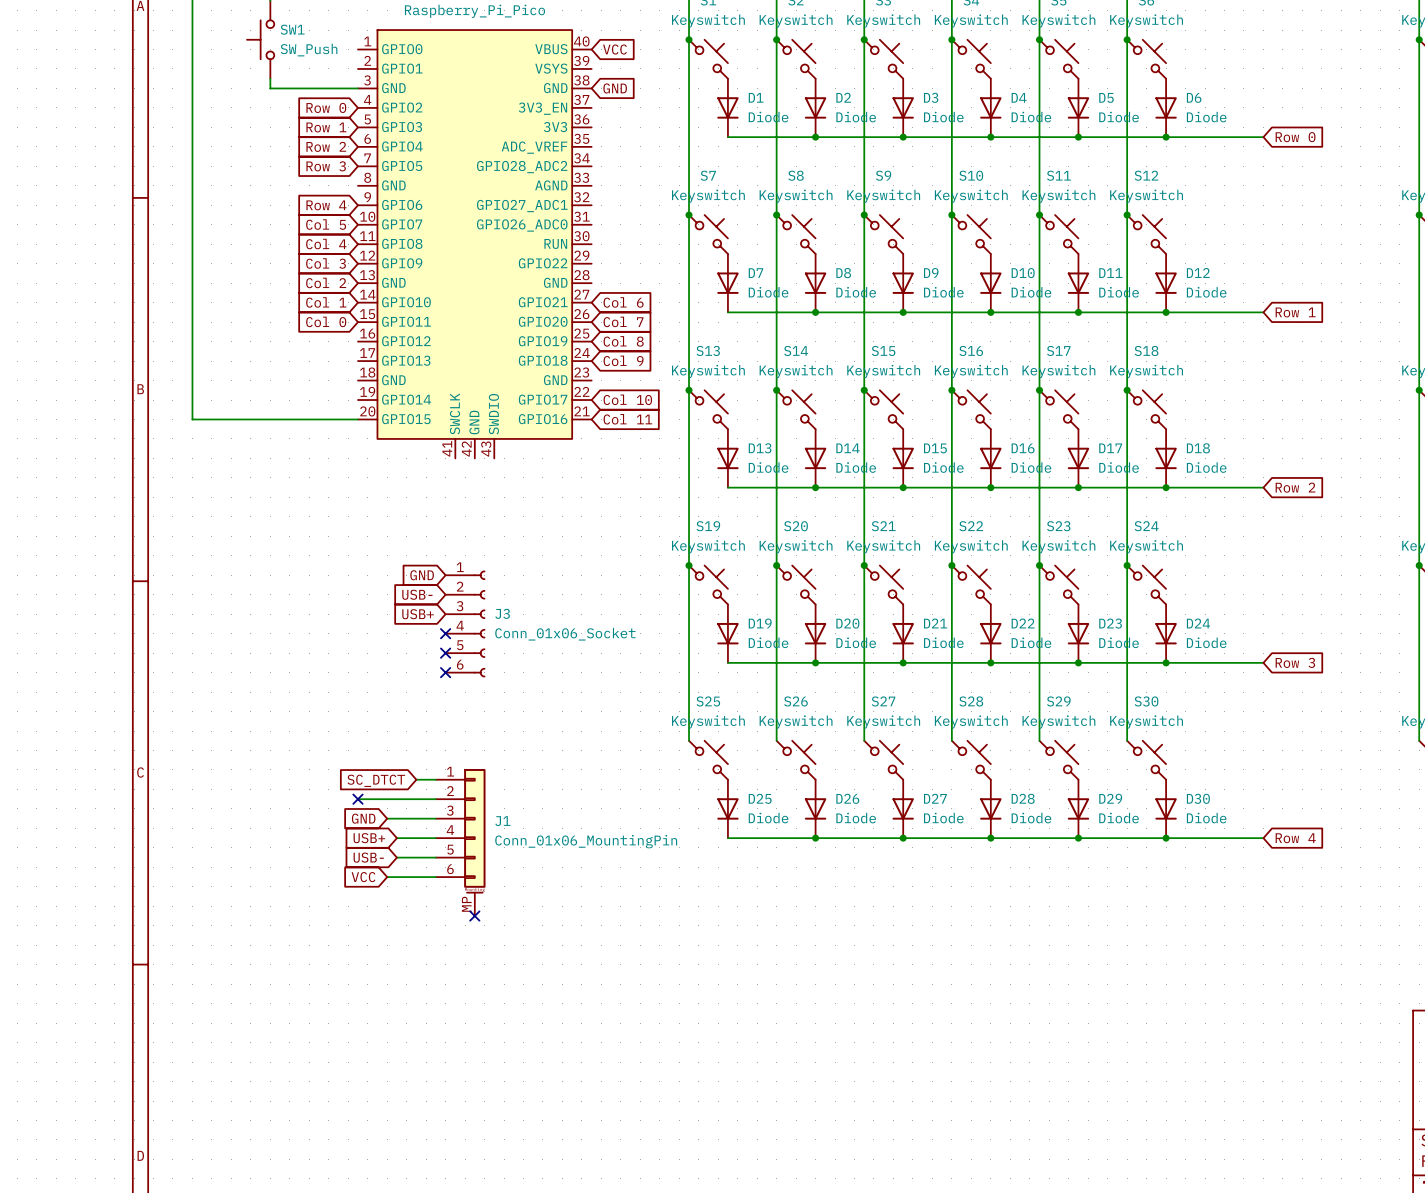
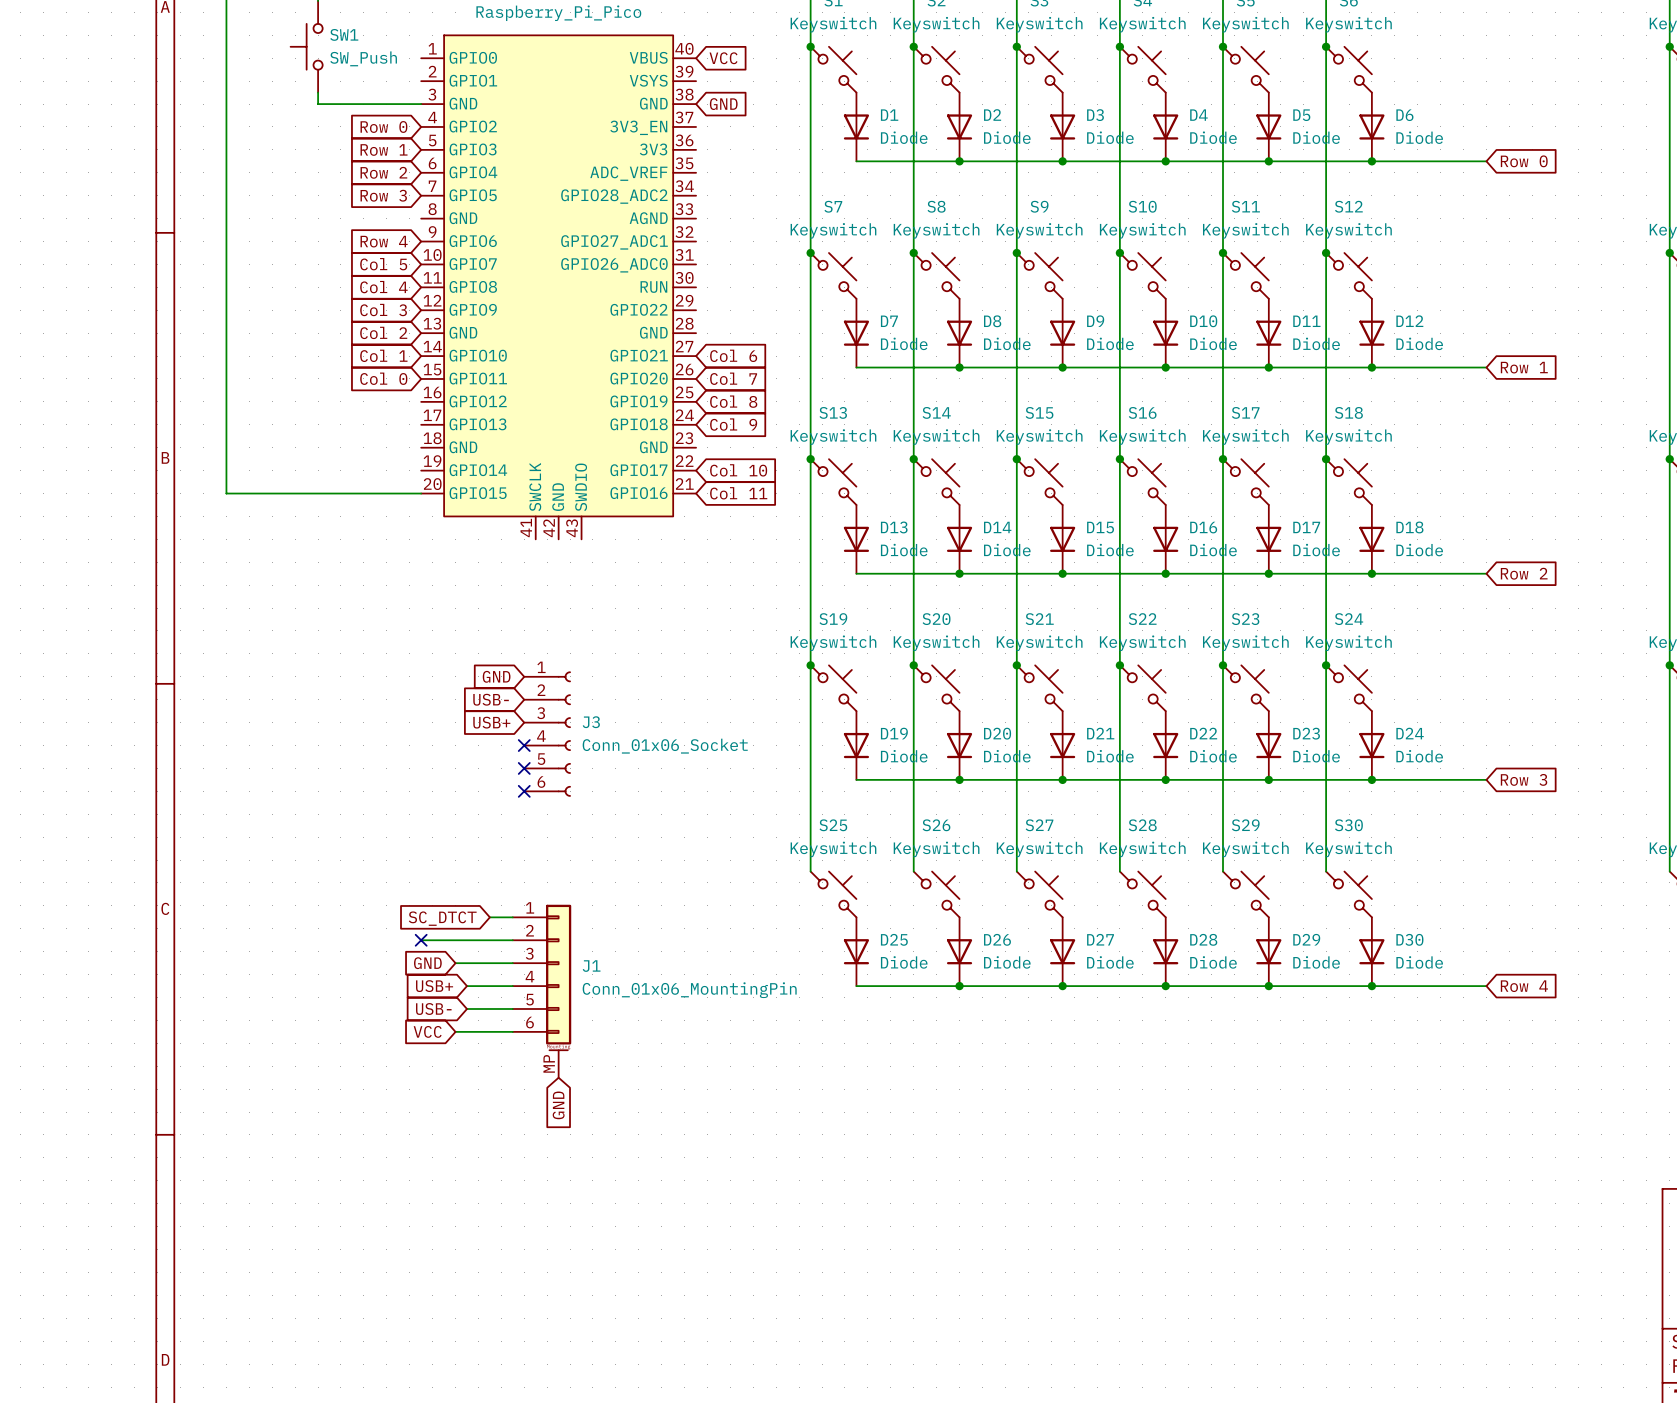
no-connect mark: (474, 916) -> none
global label: none -> GND (558, 1105)

